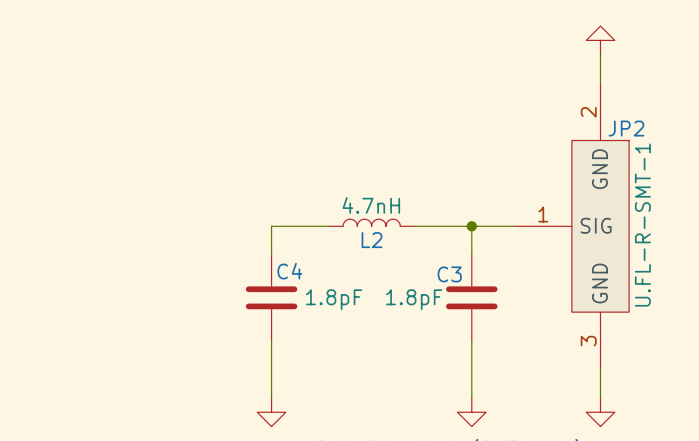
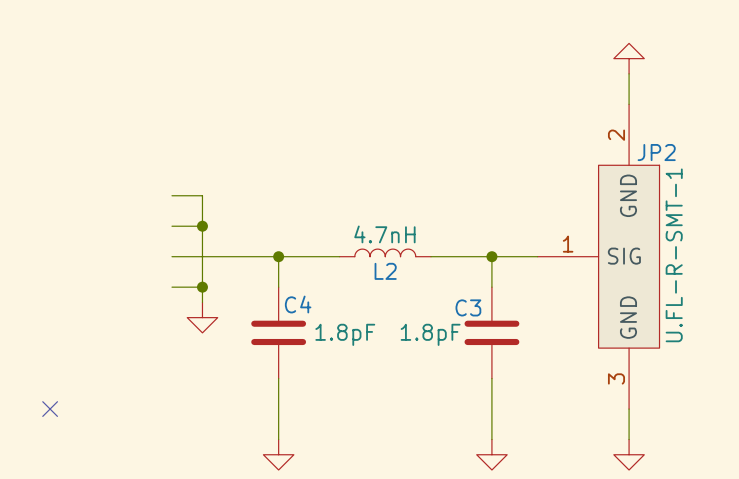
wire: none -> (171, 195) (202, 195) (202, 302)
wire: none -> (171, 226) (202, 226)
junction: none -> (202, 226)
wire: none -> (171, 256) (278, 256)
junction: none -> (278, 256)
wire: none -> (171, 287) (202, 287)
junction: none -> (202, 287)
power symbol: none -> (202, 317)
no-connect mark: none -> (50, 409)

